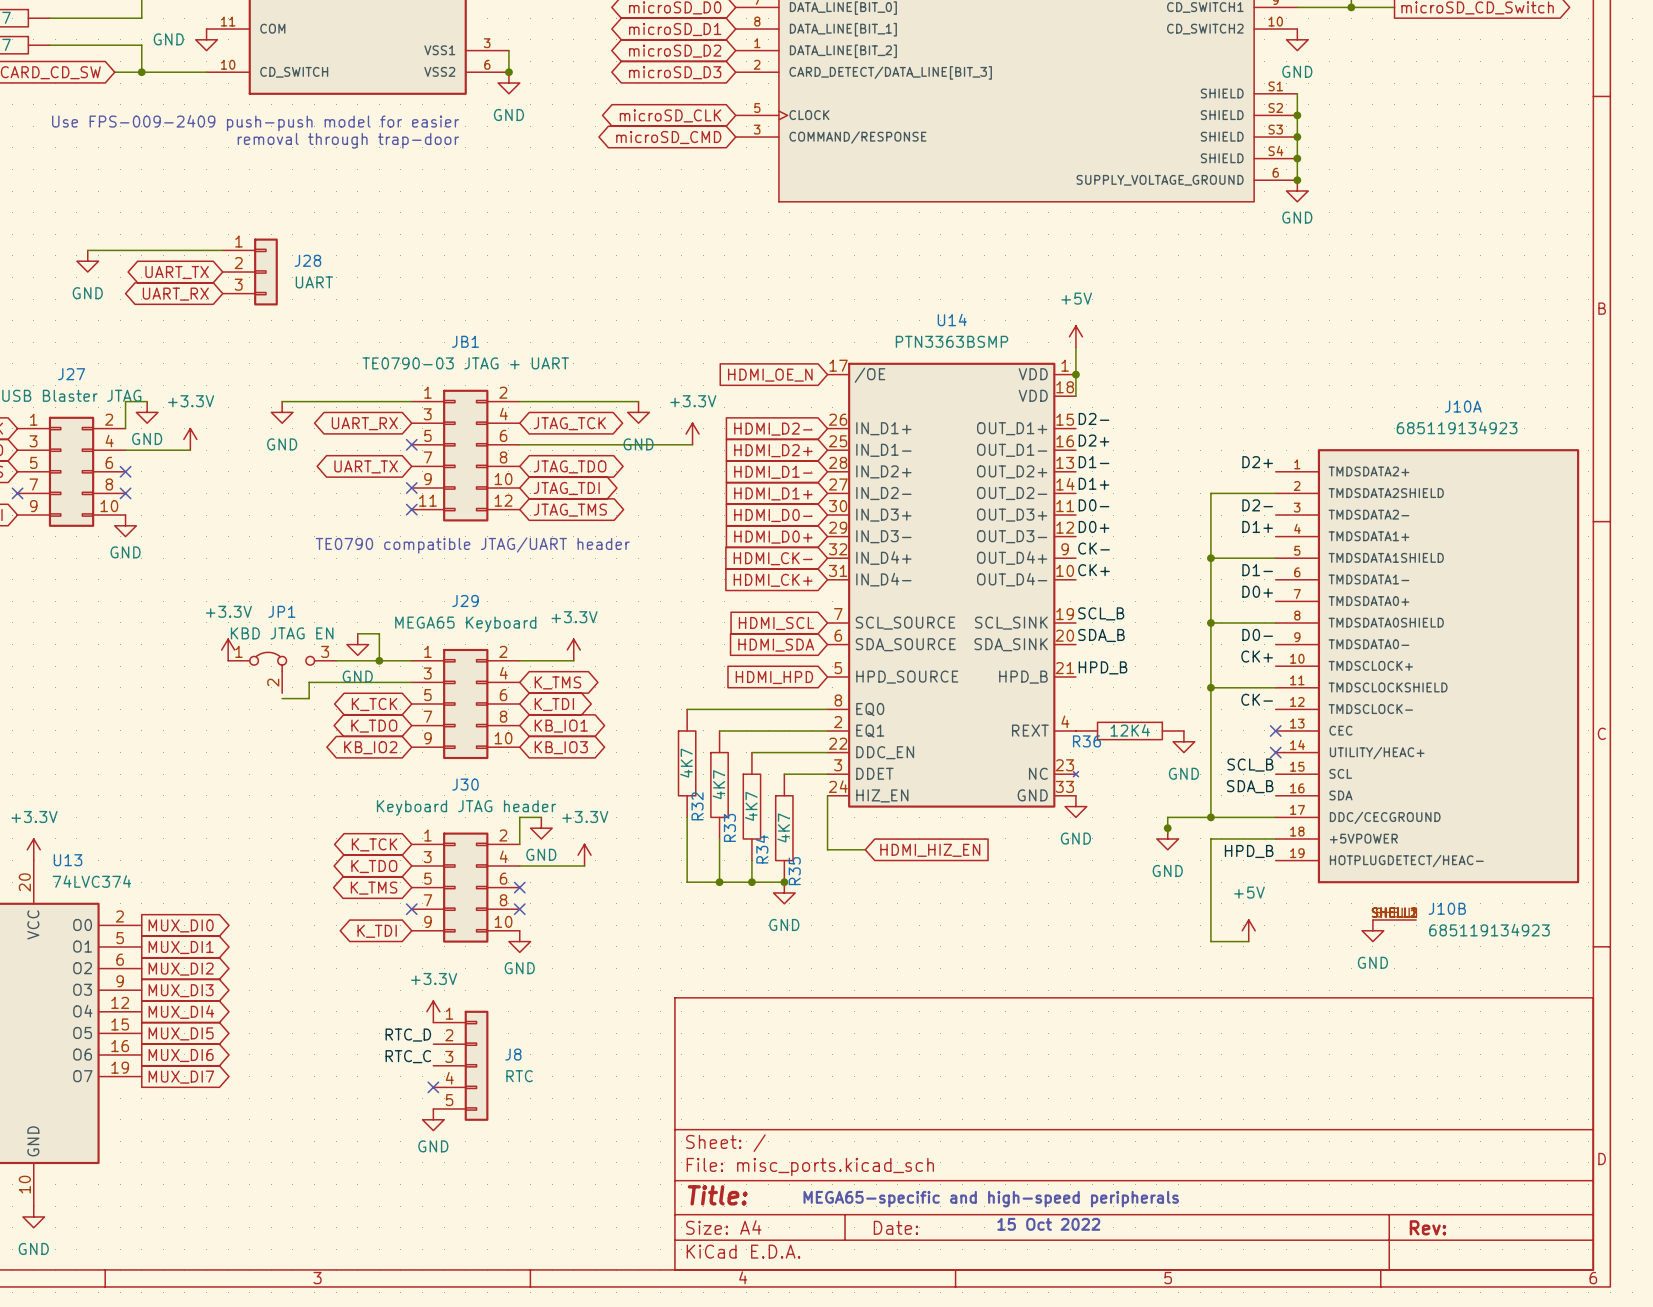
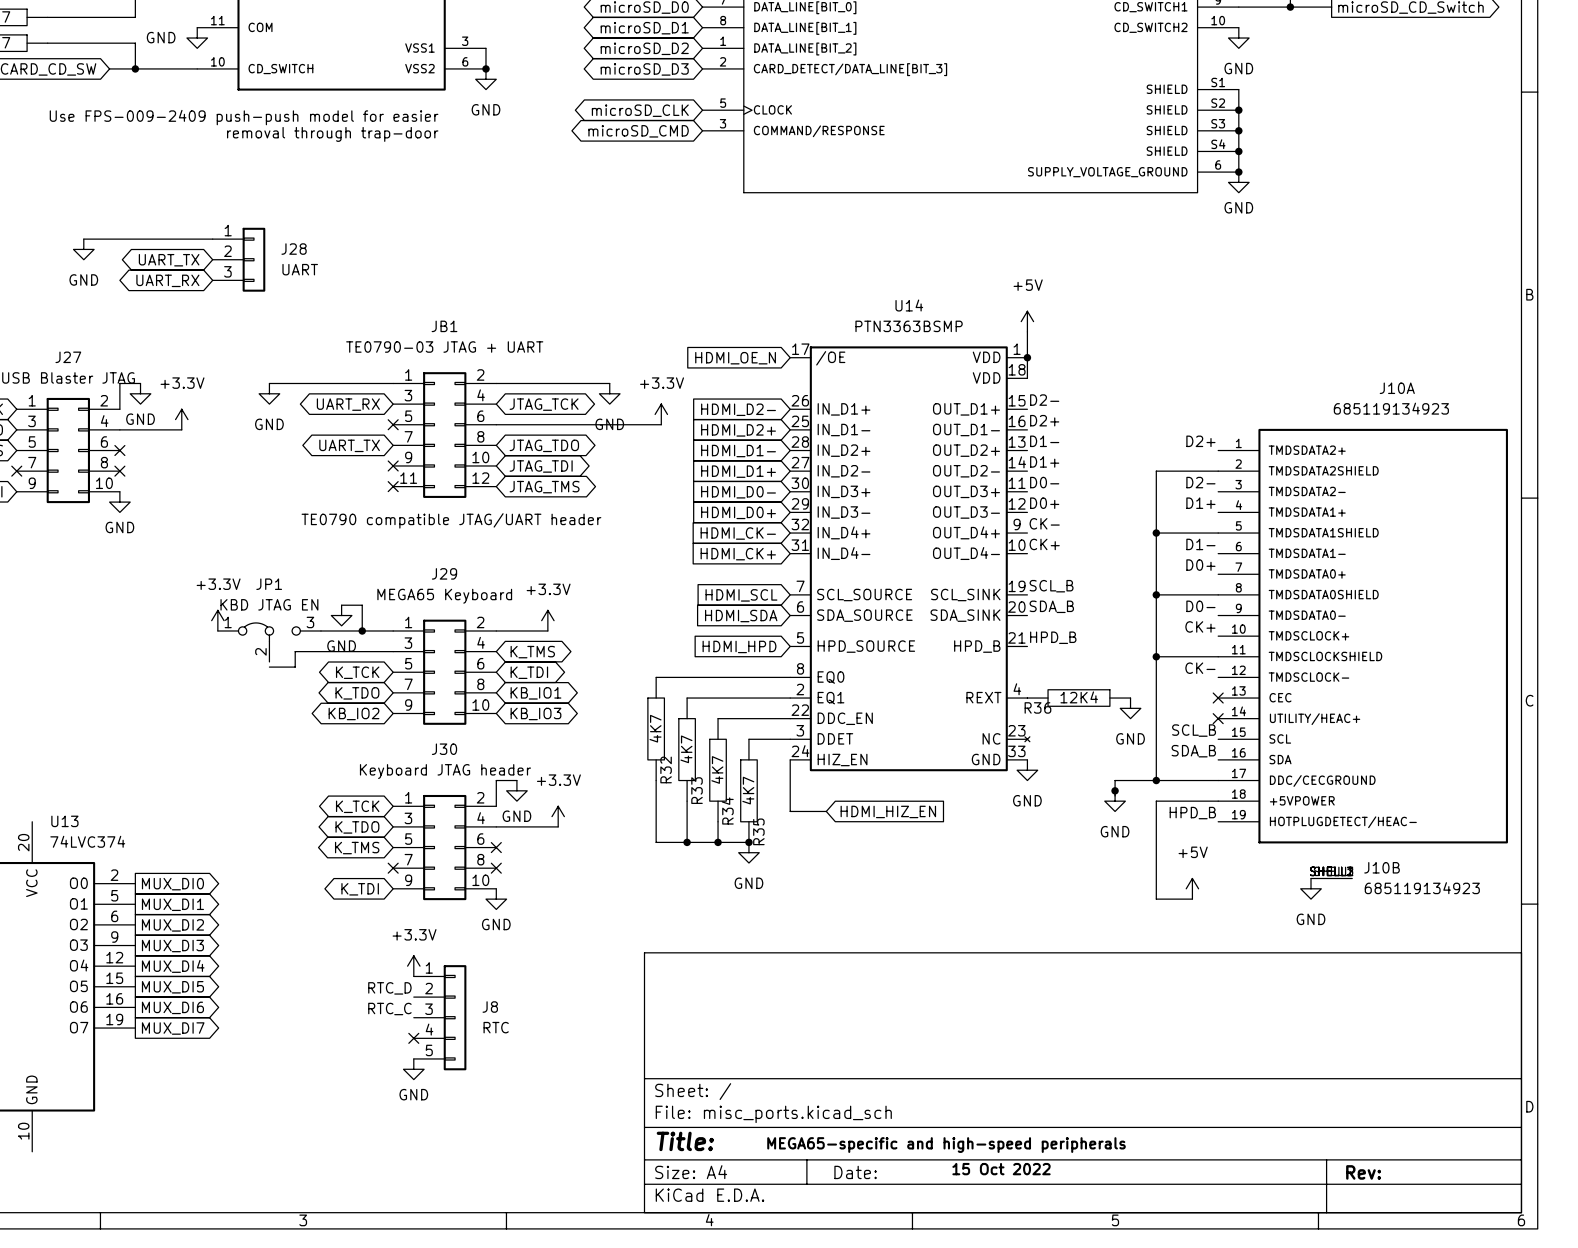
power symbol: +3.3V (33, 849) -> none
power symbol: GND (33, 1216) -> none

